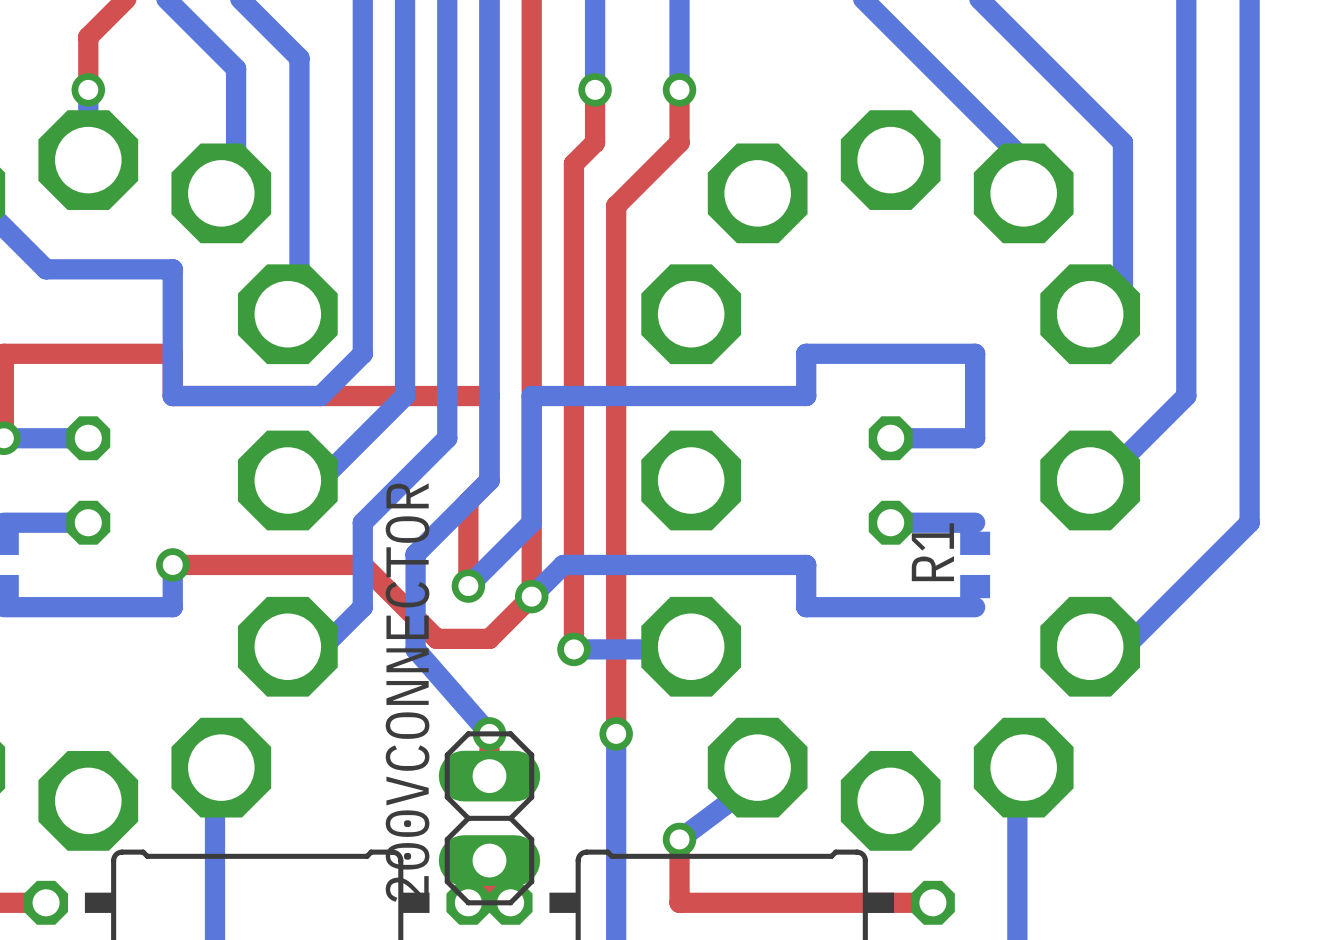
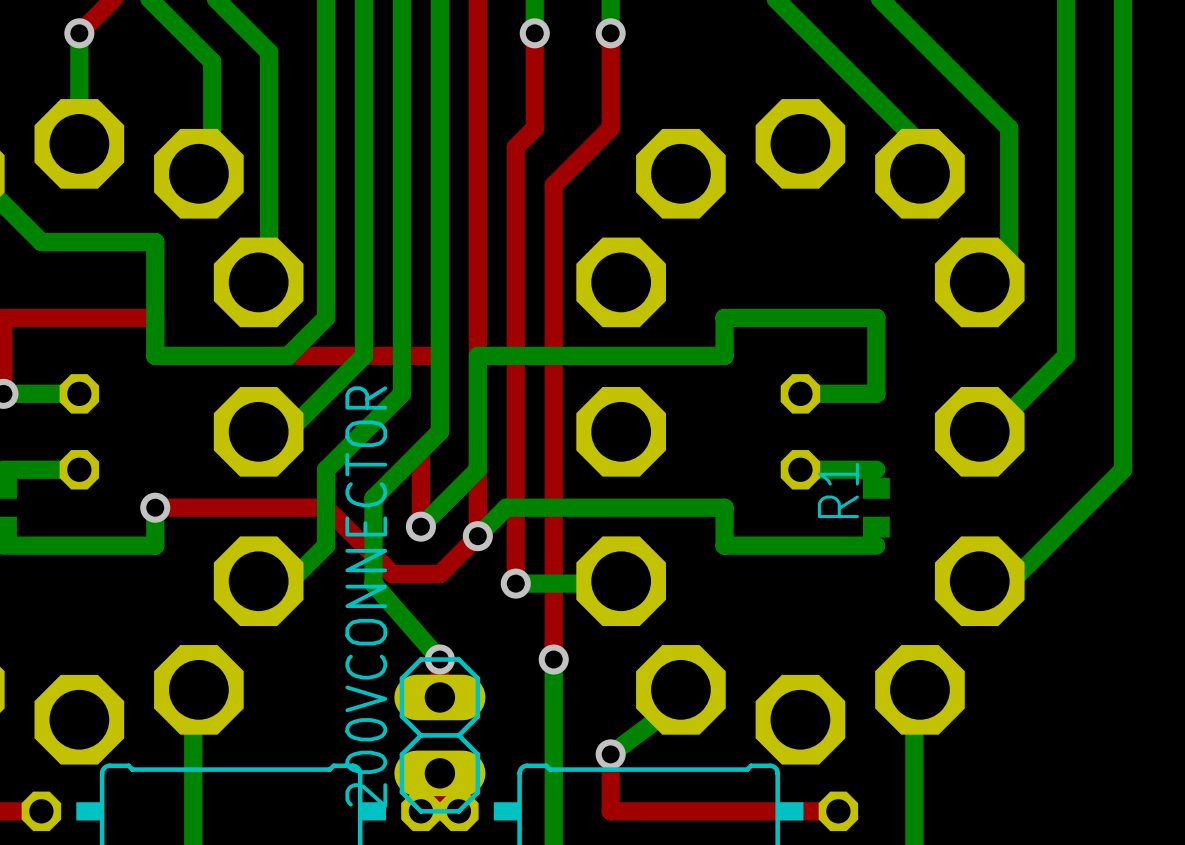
top track: (88, 37) (88, 89) -> (534, 33) (534, 80)
bottom track: (595, 37) (595, 89) -> (79, 33) (79, 80)
via: none -> (534, 33)
bottom track: (679, 37) (679, 89) -> none
top track: none -> (610, 33) (610, 80)
via: none -> (610, 33)
via position: (88, 89) -> (79, 33)
via: (595, 89) -> none
via: (679, 89) -> none

